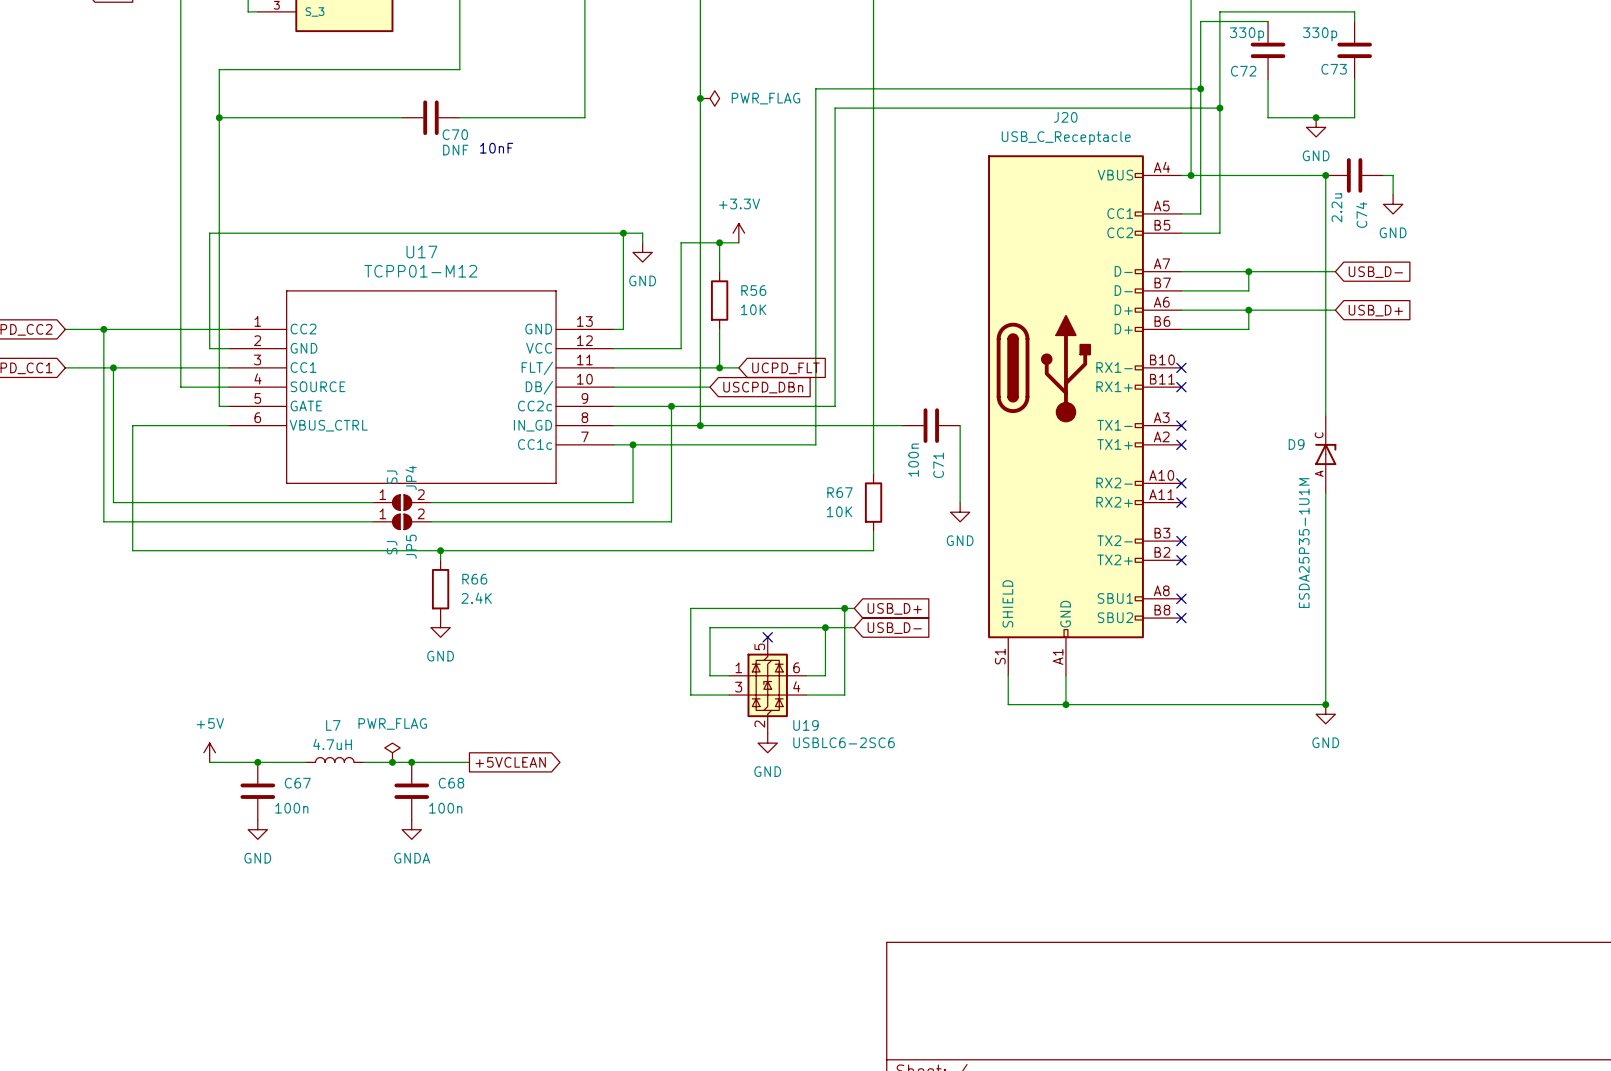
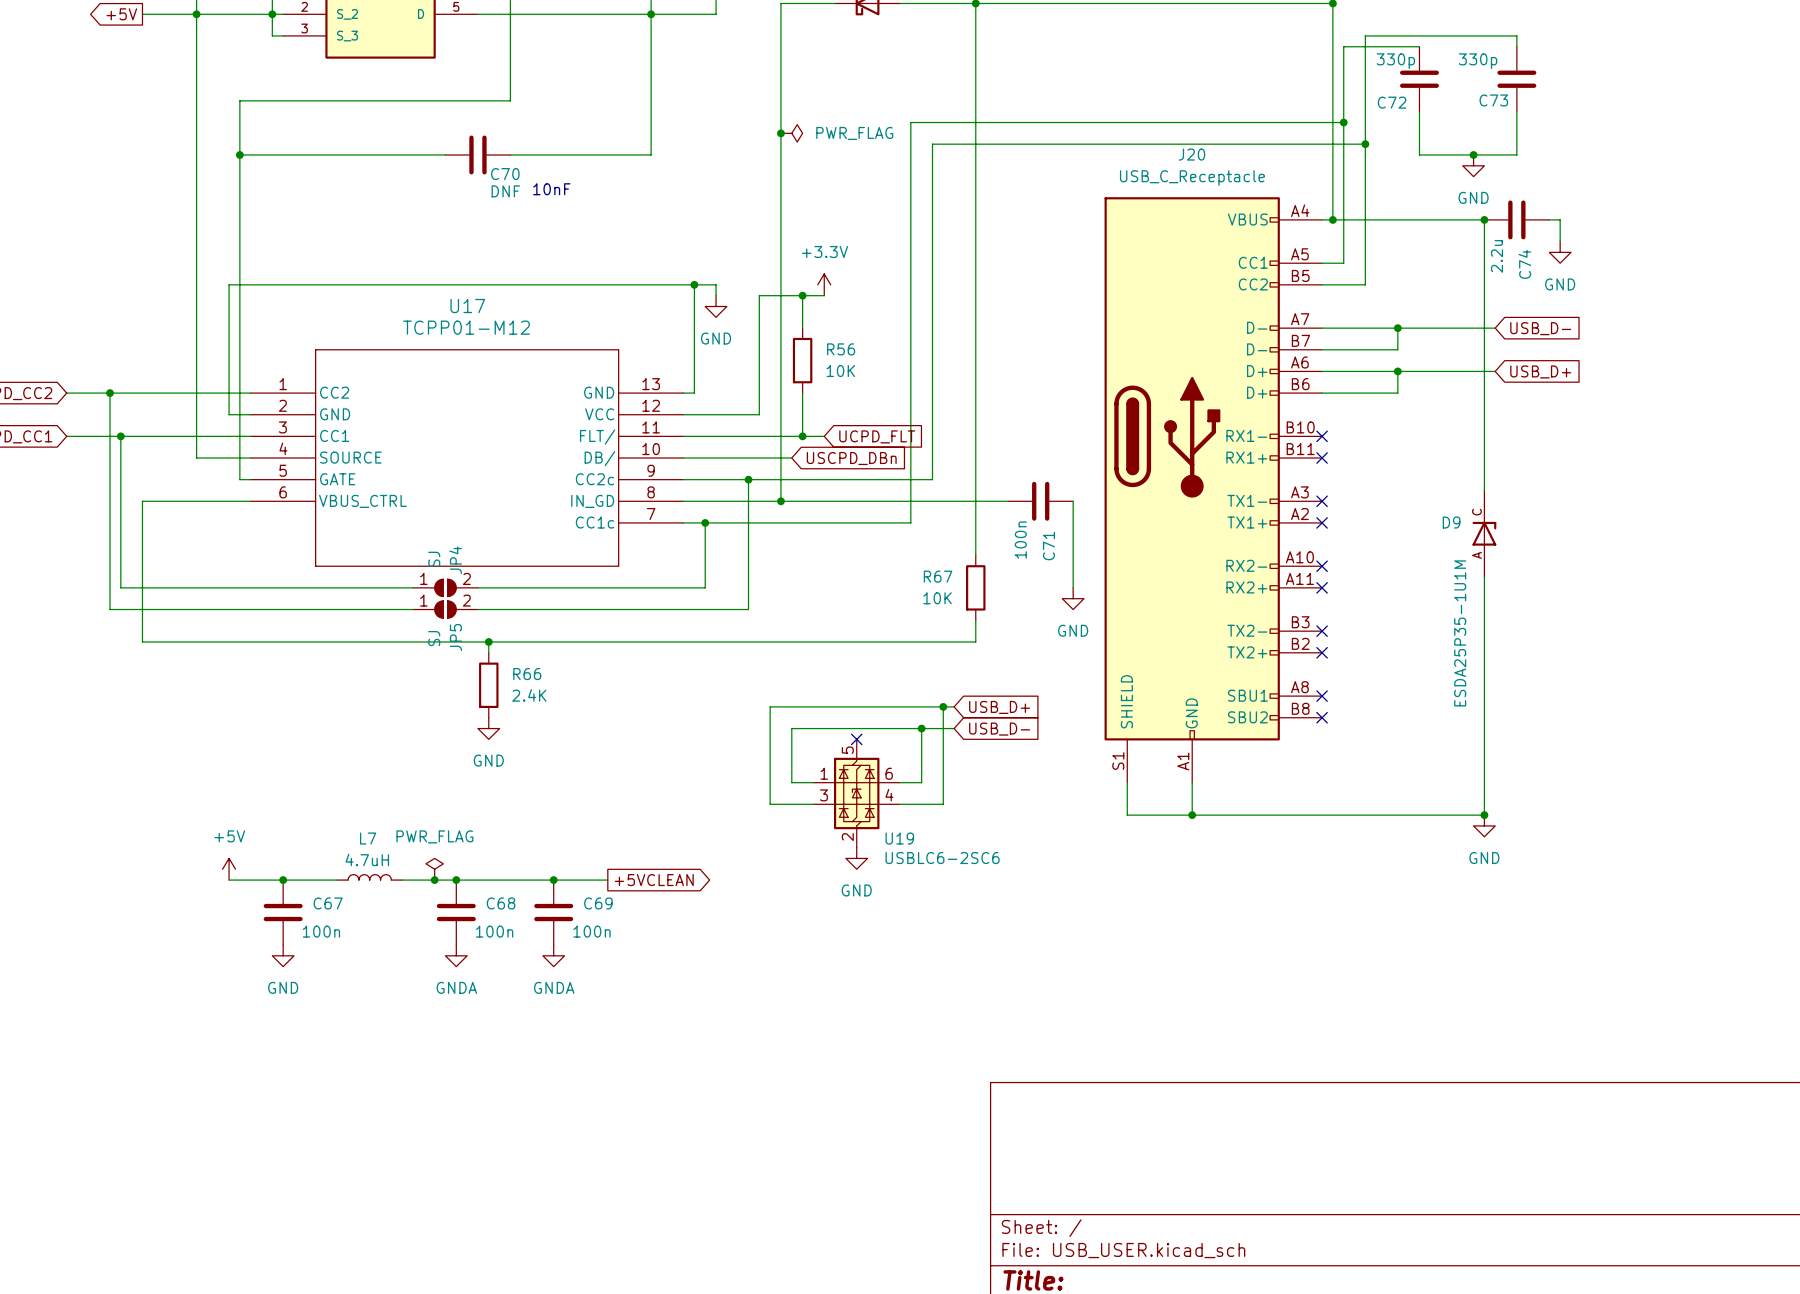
wire: none -> (521, 880) (607, 880)
junction: none -> (553, 880)
global label position: +5VCLEAN (510, 762) -> +5VCLEAN (654, 880)
C69: none -> 100n (553, 912)
power symbol: none -> GNDA (553, 955)

